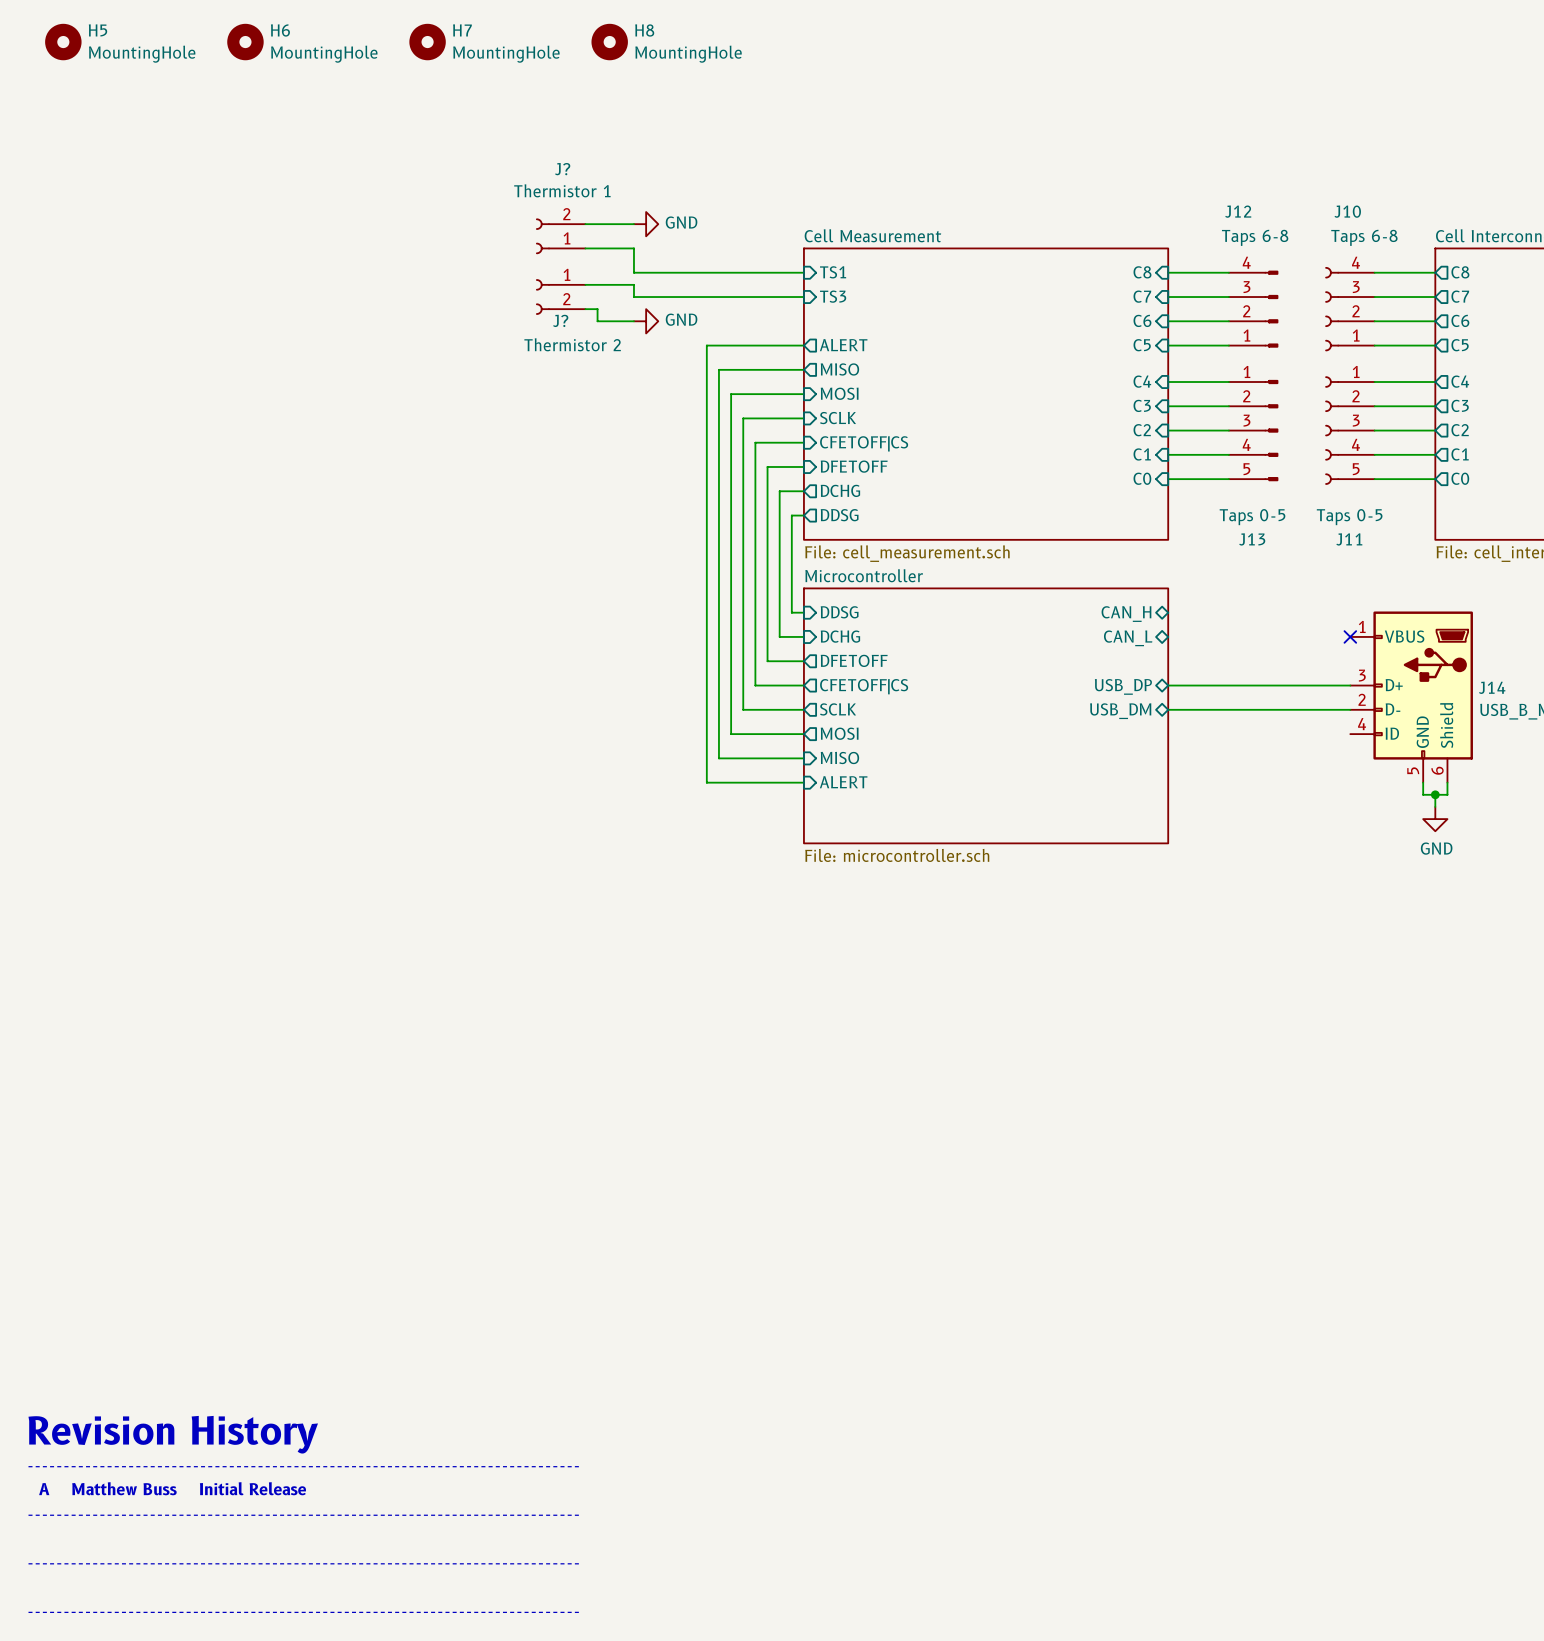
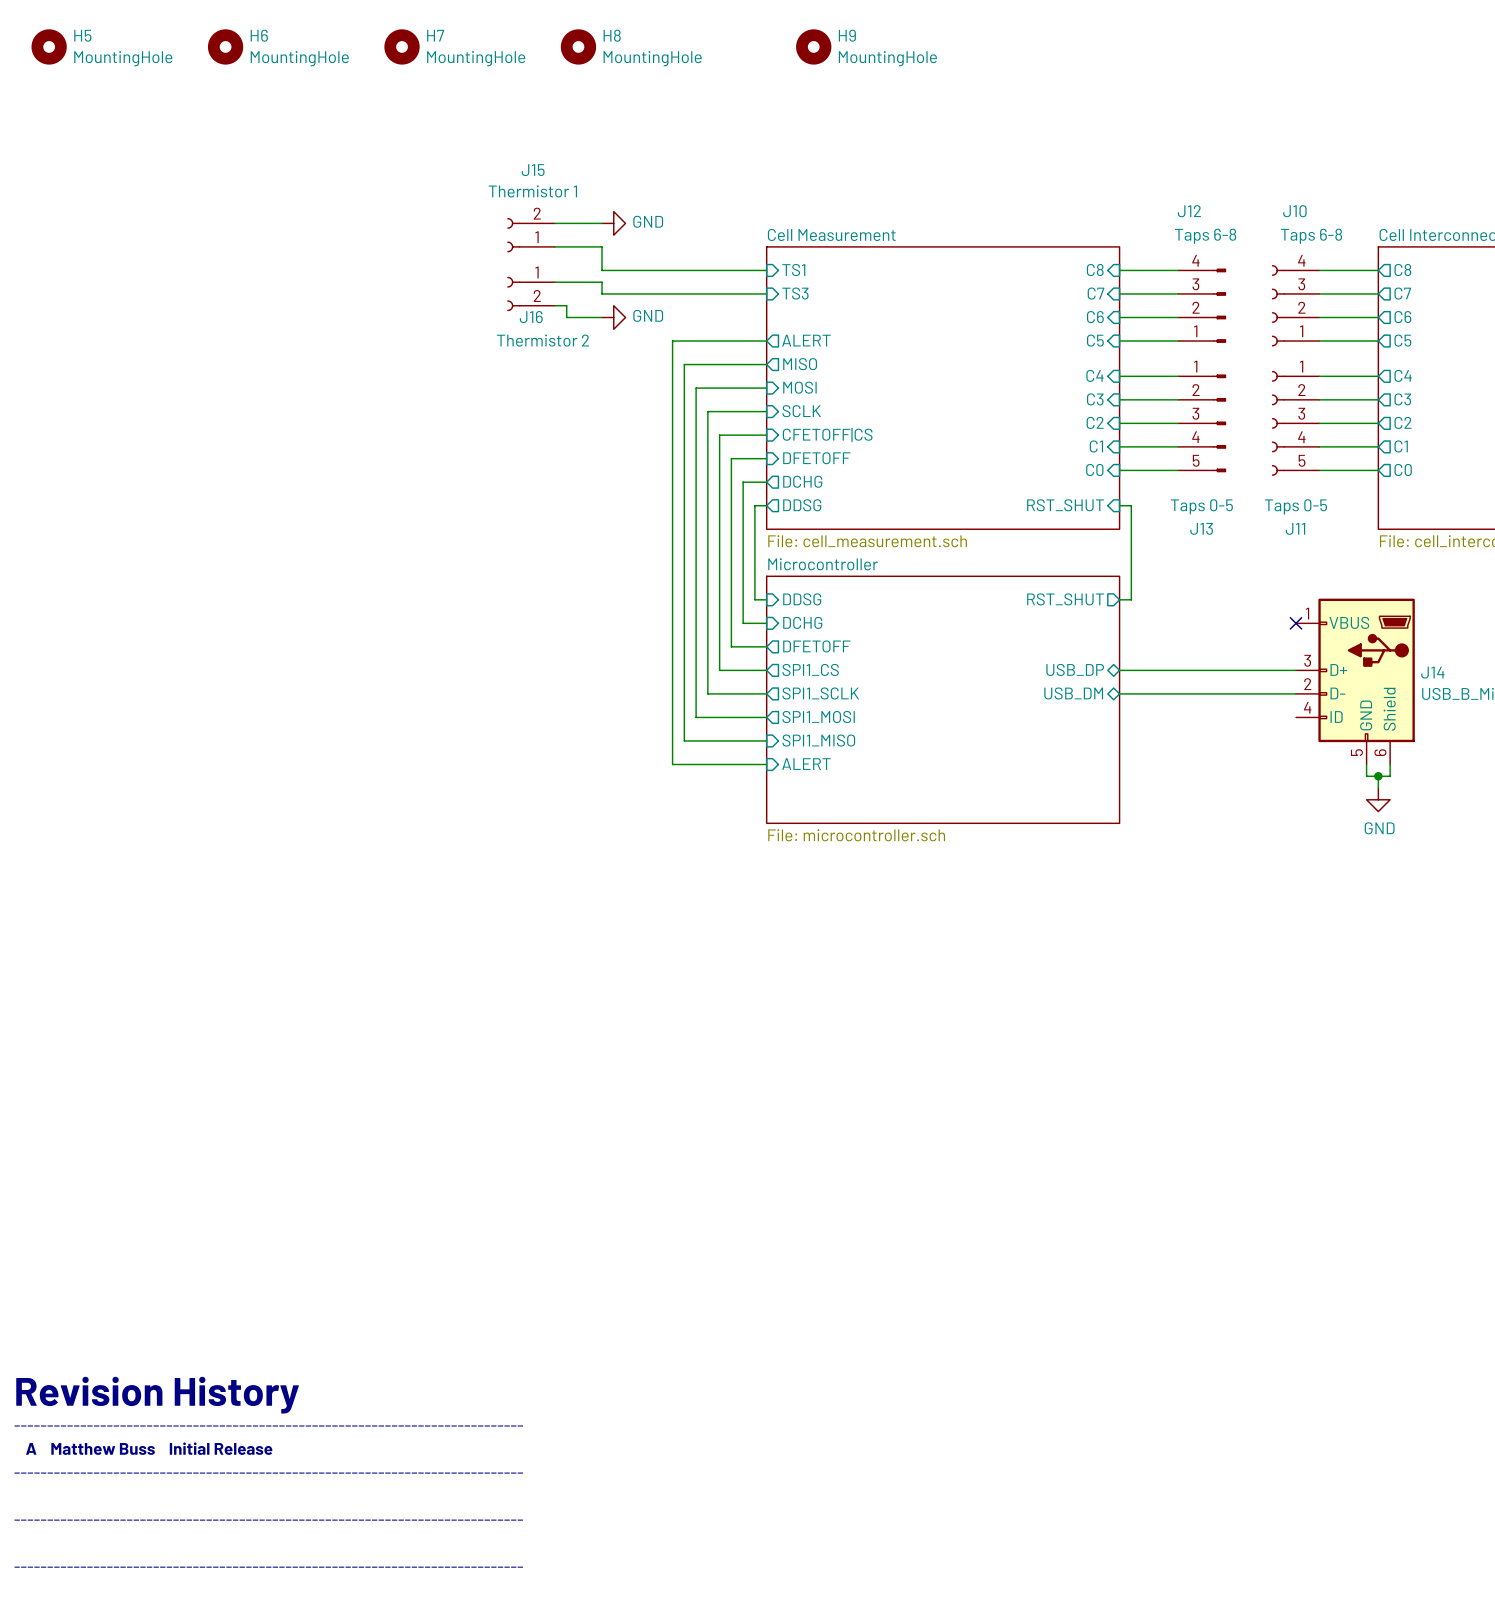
H9: none -> MountingHole (813, 46)
J? name: J? (562, 169) -> J15 (533, 170)
J? name: J? (560, 320) -> J16 (531, 317)
wire: none -> (1119, 505) (1131, 505) (1131, 599) (1119, 599)
sheet pin: none -> RST_SHUT (1065, 505)
sheet pin shape: bidirectional (1126, 614) -> output (1065, 599)
sheet pin: CAN_H (1126, 614) -> RST_SHUT (1065, 599)
sheet pin: CAN_L (1128, 638) -> none
sheet pin: CFETOFF|CS (864, 686) -> SPI1_CS (810, 669)
sheet pin: SCLK (838, 709) -> SPI1_SCLK (820, 693)
sheet pin: MOSI (839, 733) -> SPI1_MOSI (818, 717)
sheet pin: MISO (839, 758) -> SPI1_MISO (818, 740)

